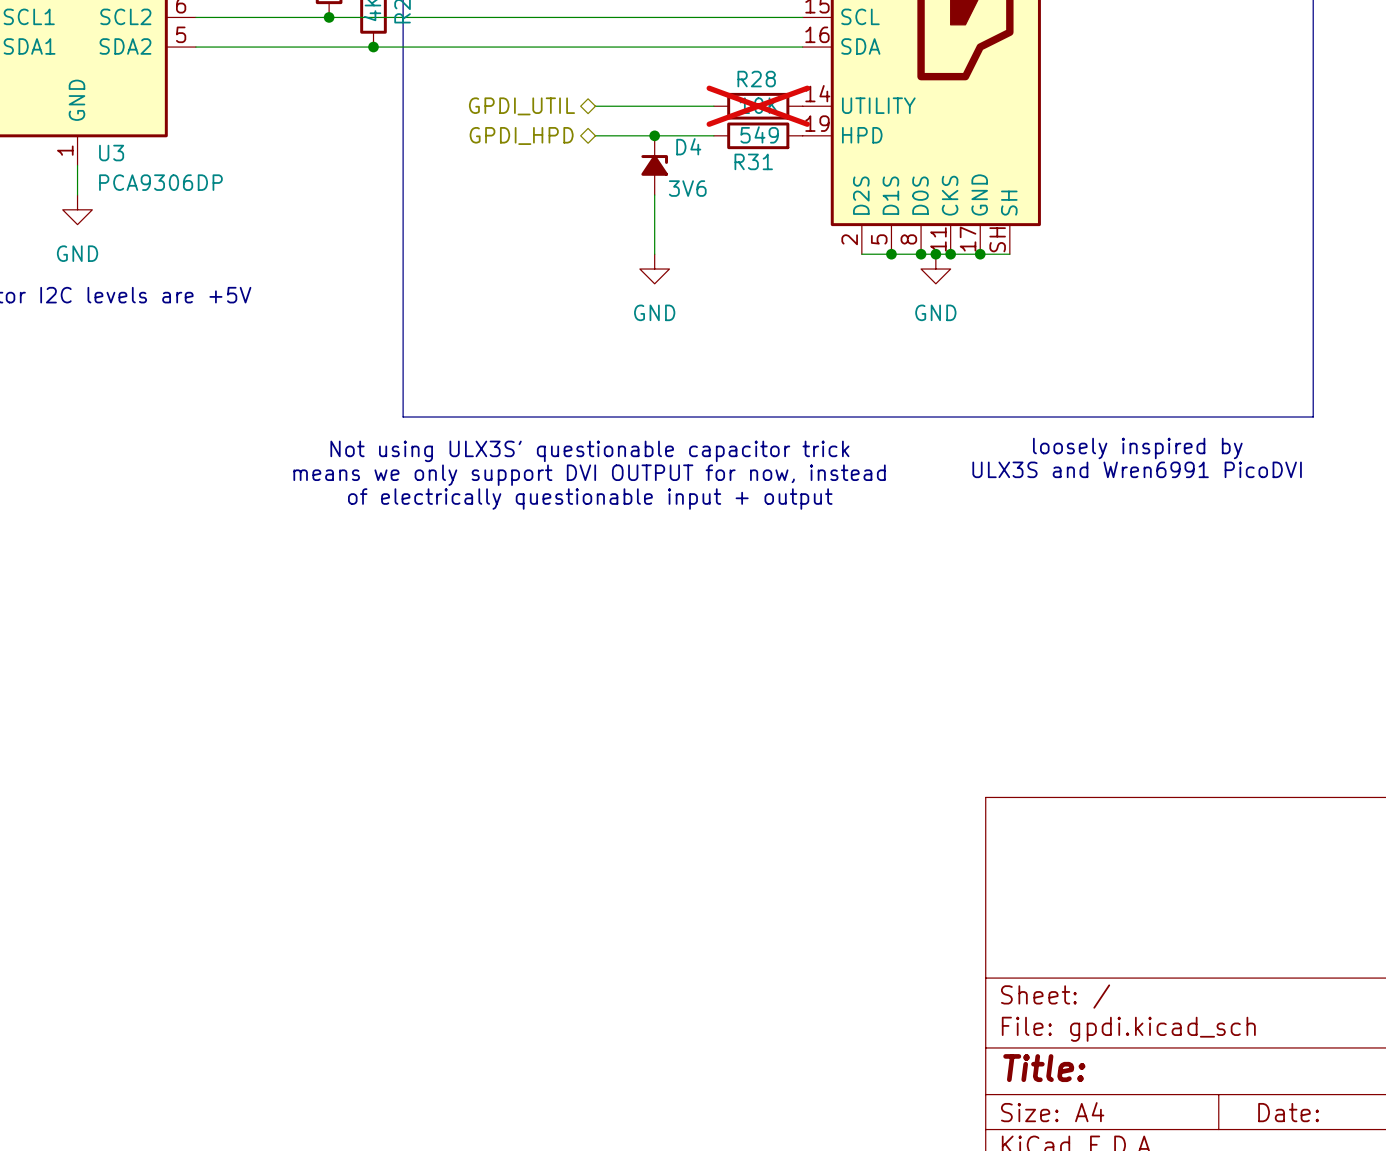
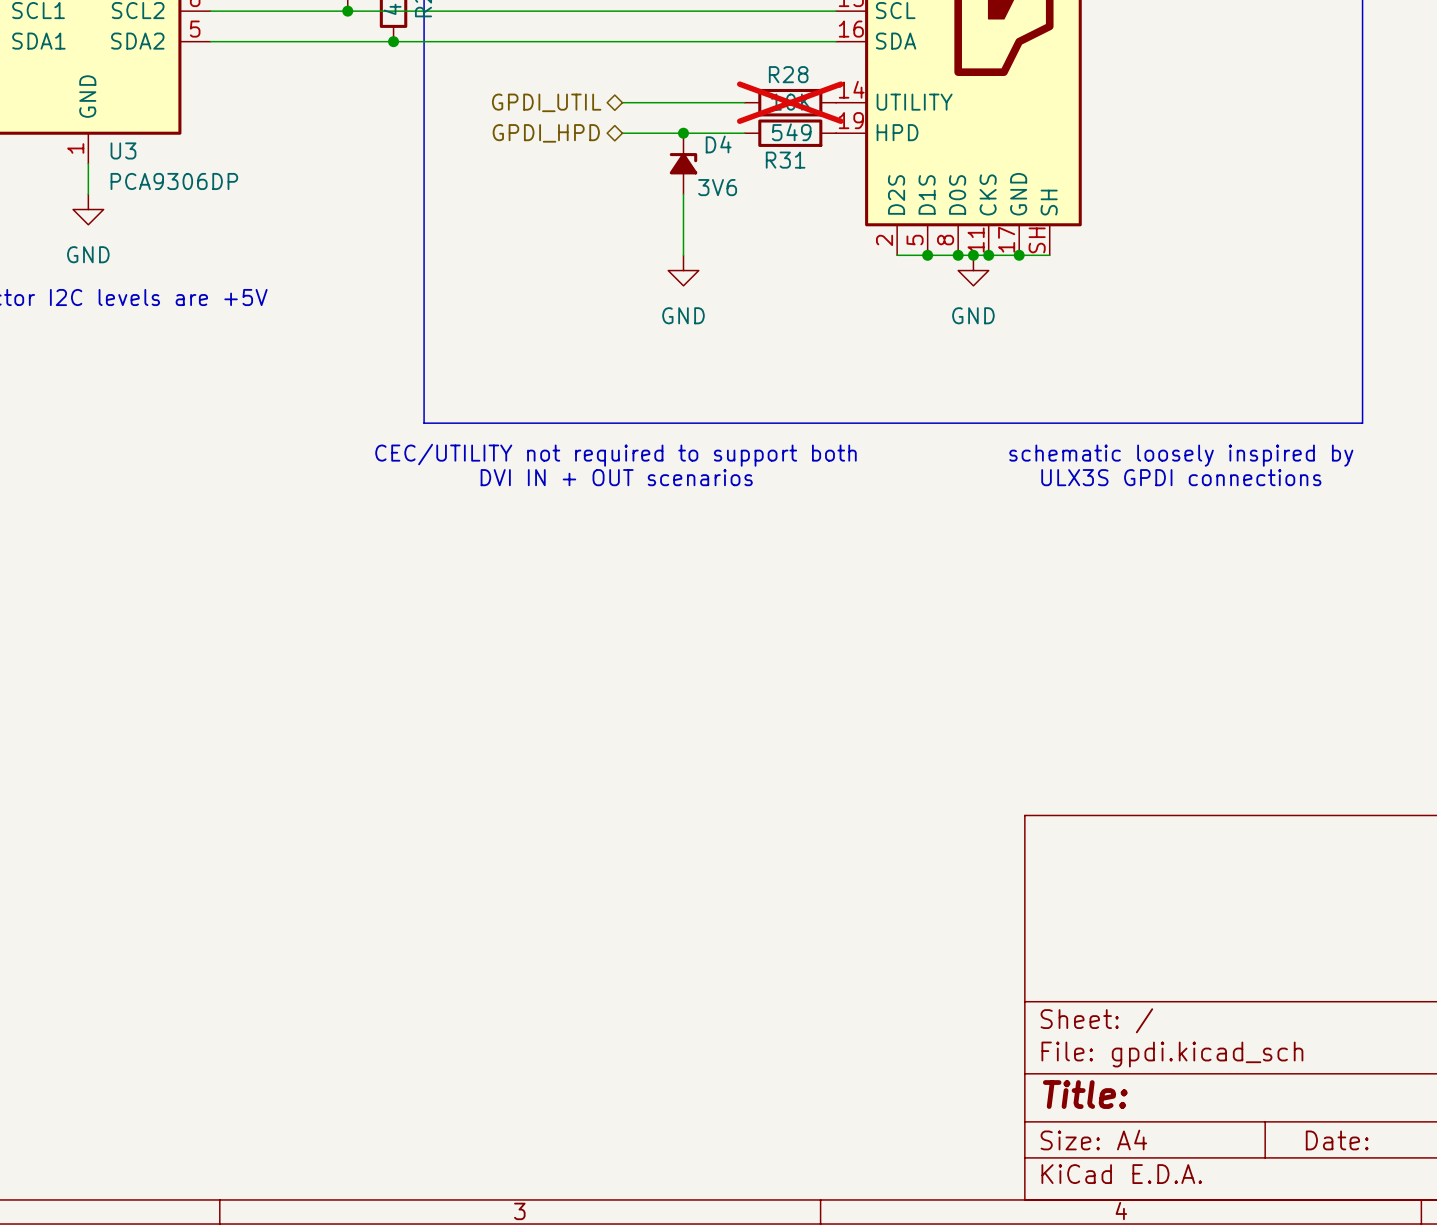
text: loosely inspired by (1137, 448) -> schematic loosely inspired by (1181, 455)
text: Not using ULX3S' questionable capacitor trick (589, 451) -> CEC/UTILITY not required to support both (615, 455)
text: ULX3S and Wren6991 PicoDVI (1137, 469) -> ULX3S GPDI connections (1181, 477)
text: means we only support DVI OUTPUT for now, instead (589, 475) -> DVI IN + OUT scenarios (616, 477)
text: of electrically questionable input + output (590, 499) -> none

